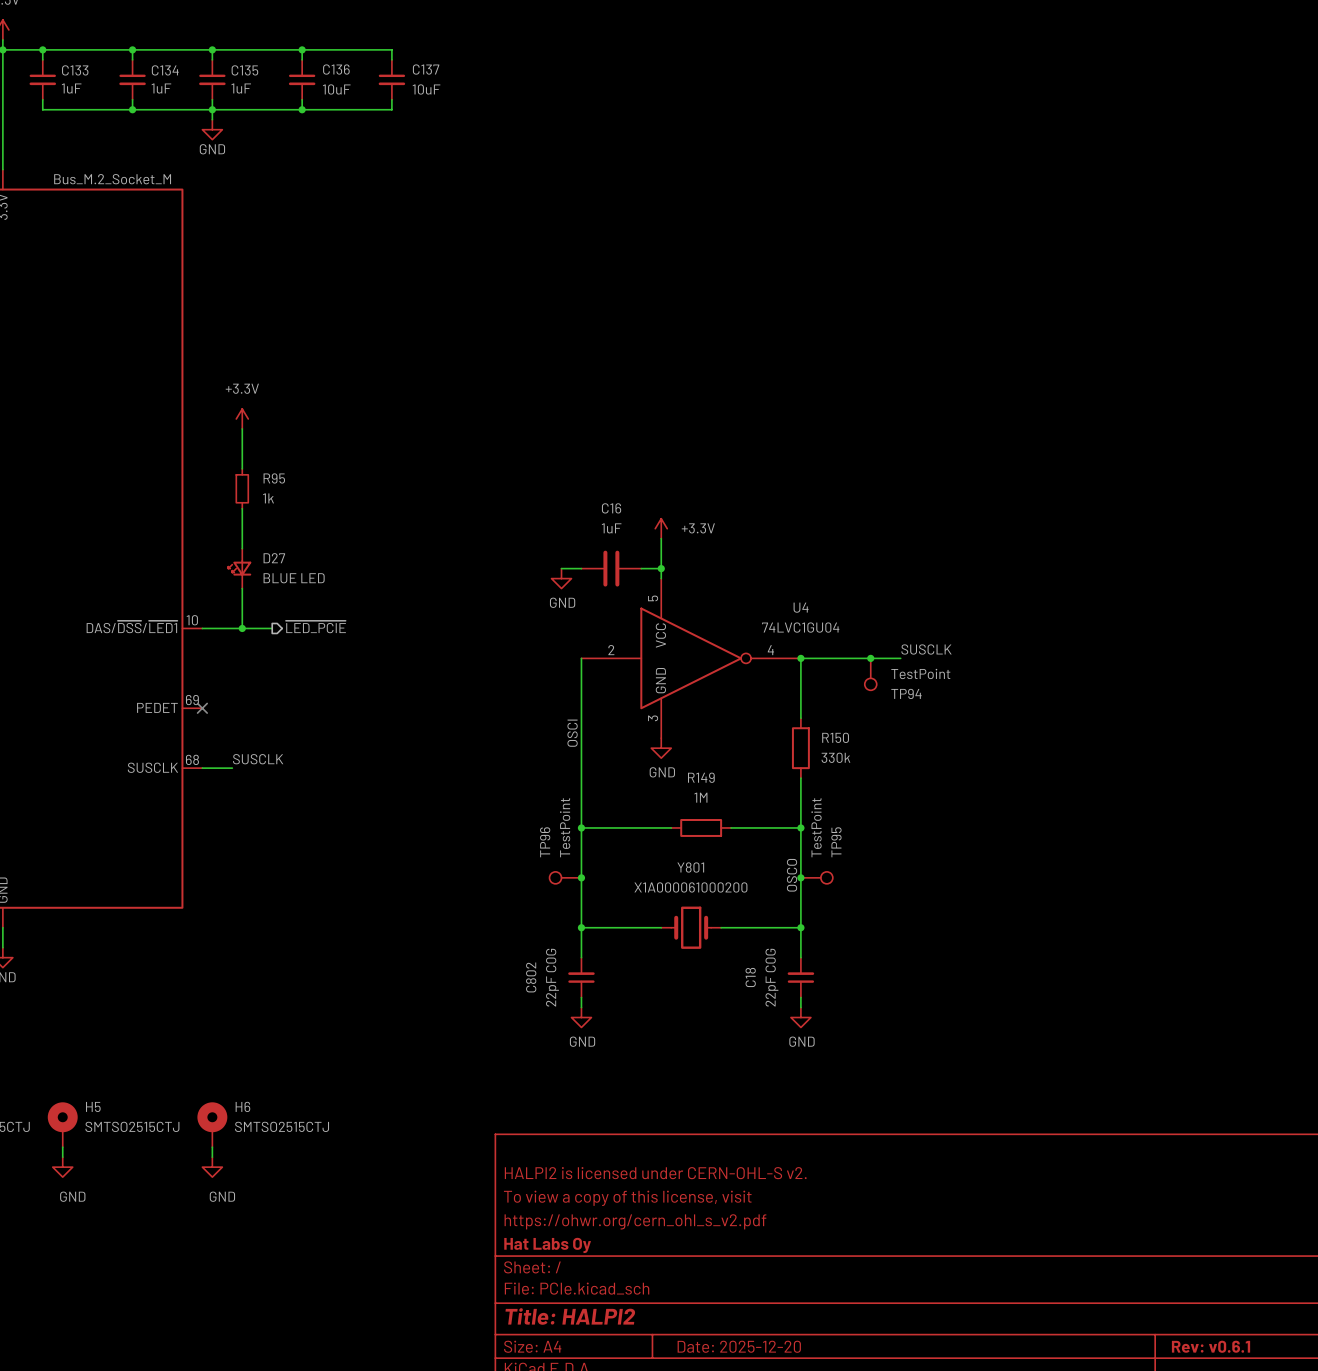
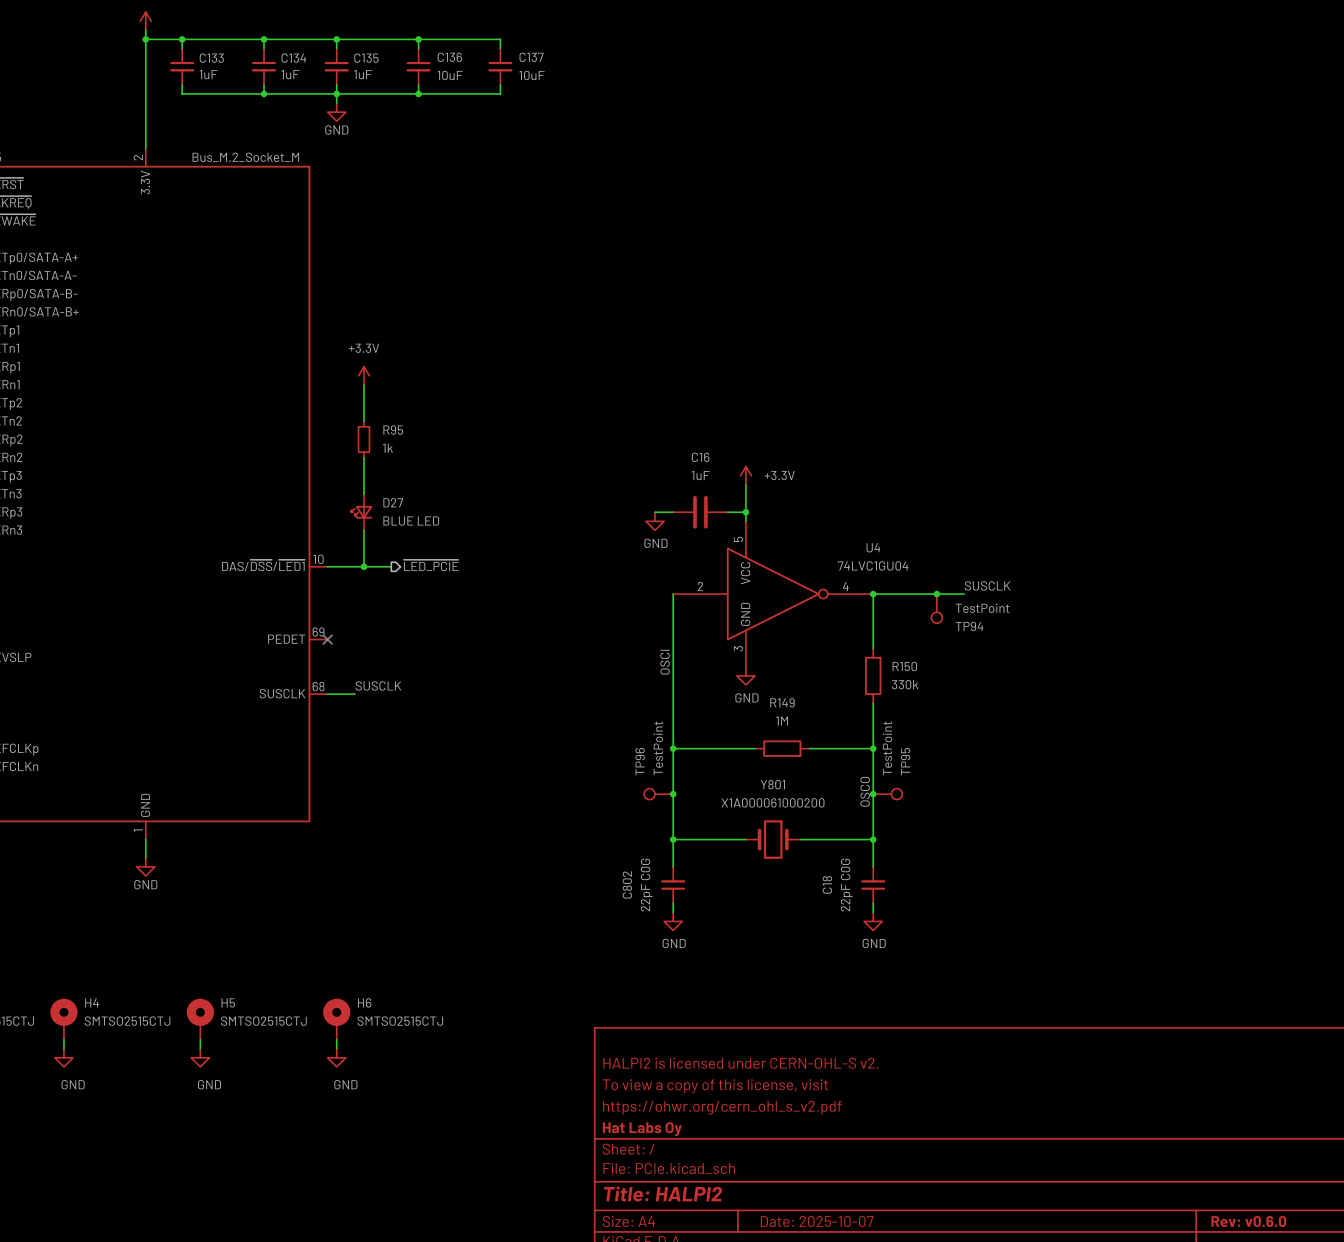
title block: Date: 2025-12-20 (739, 1346) -> Date: 2025-10-07 (817, 1221)
title block: Rev: v0.6.1 (1211, 1346) -> Rev: v0.6.0 (1248, 1221)

